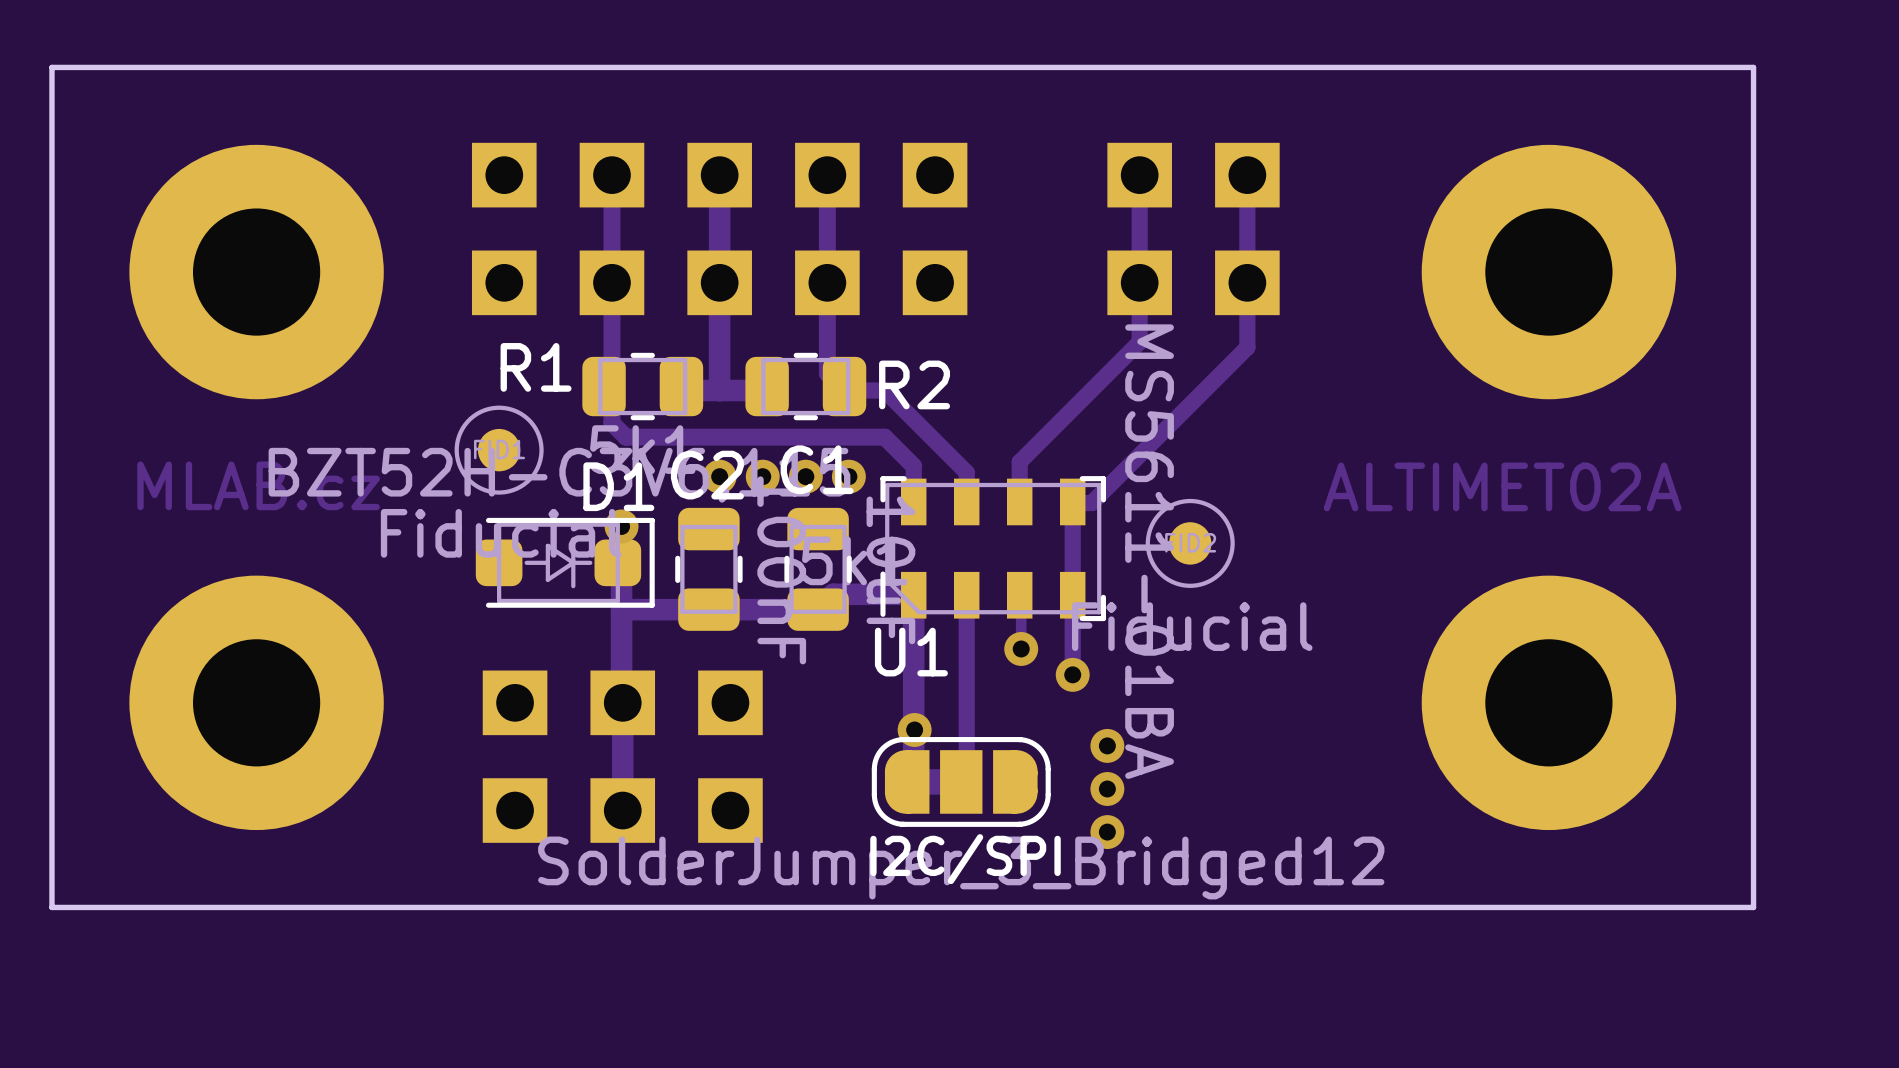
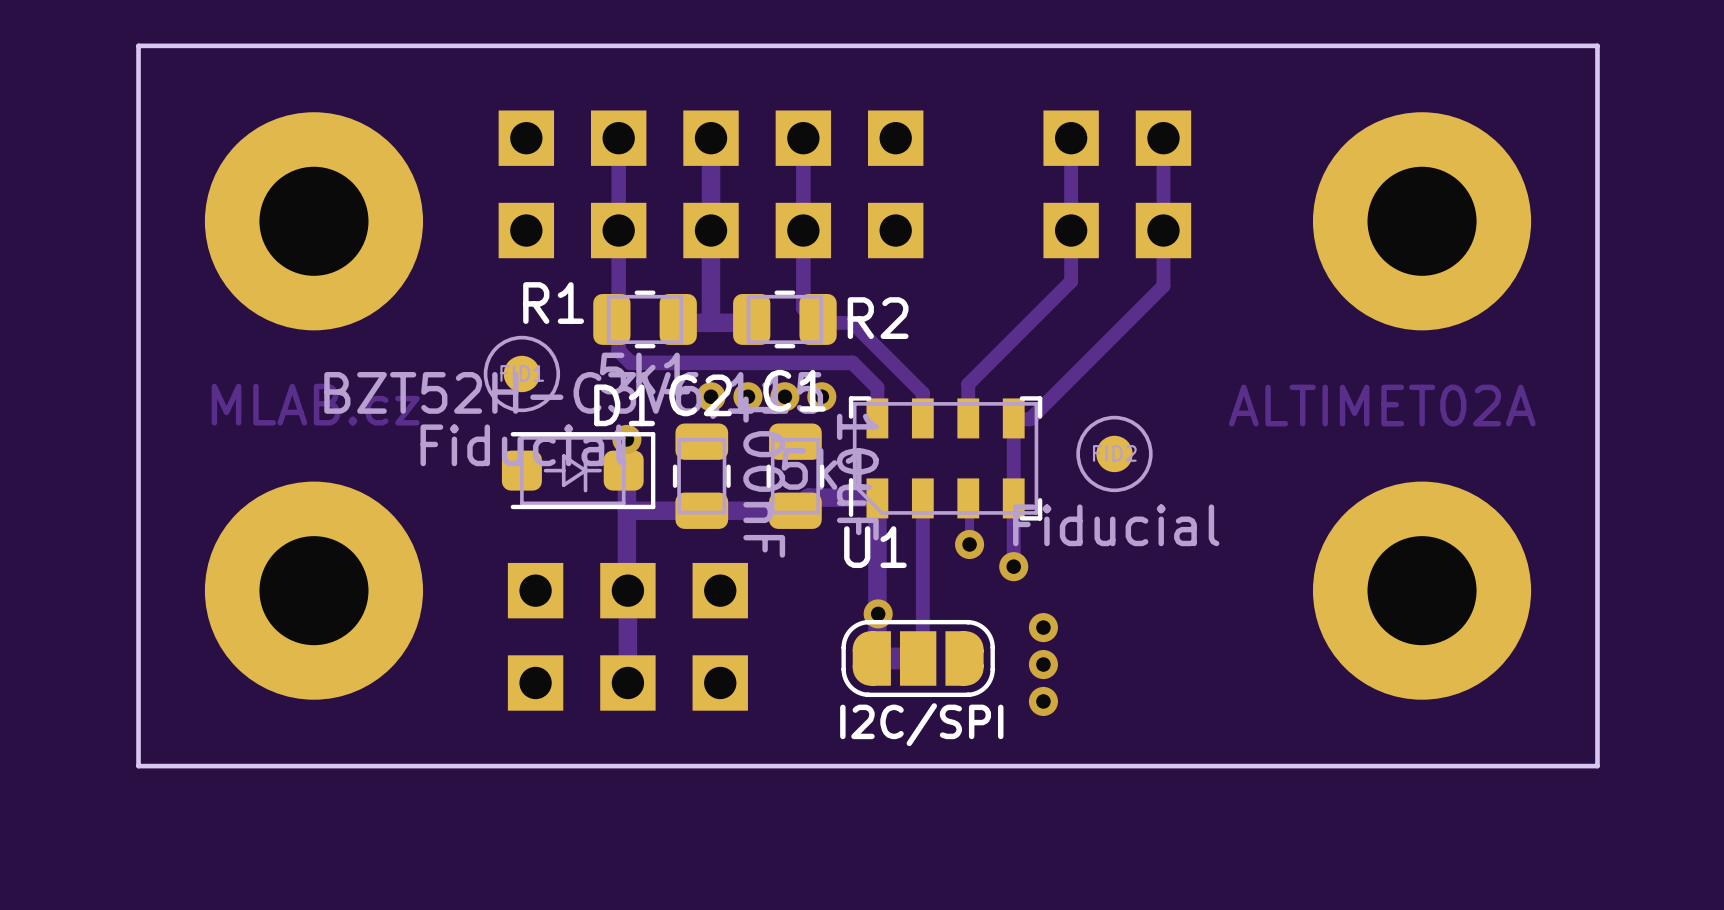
U1 value: MS5611-01BA (1149, 551) -> none
part value: SolderJumper_3_Bridged12 (961, 867) -> none

